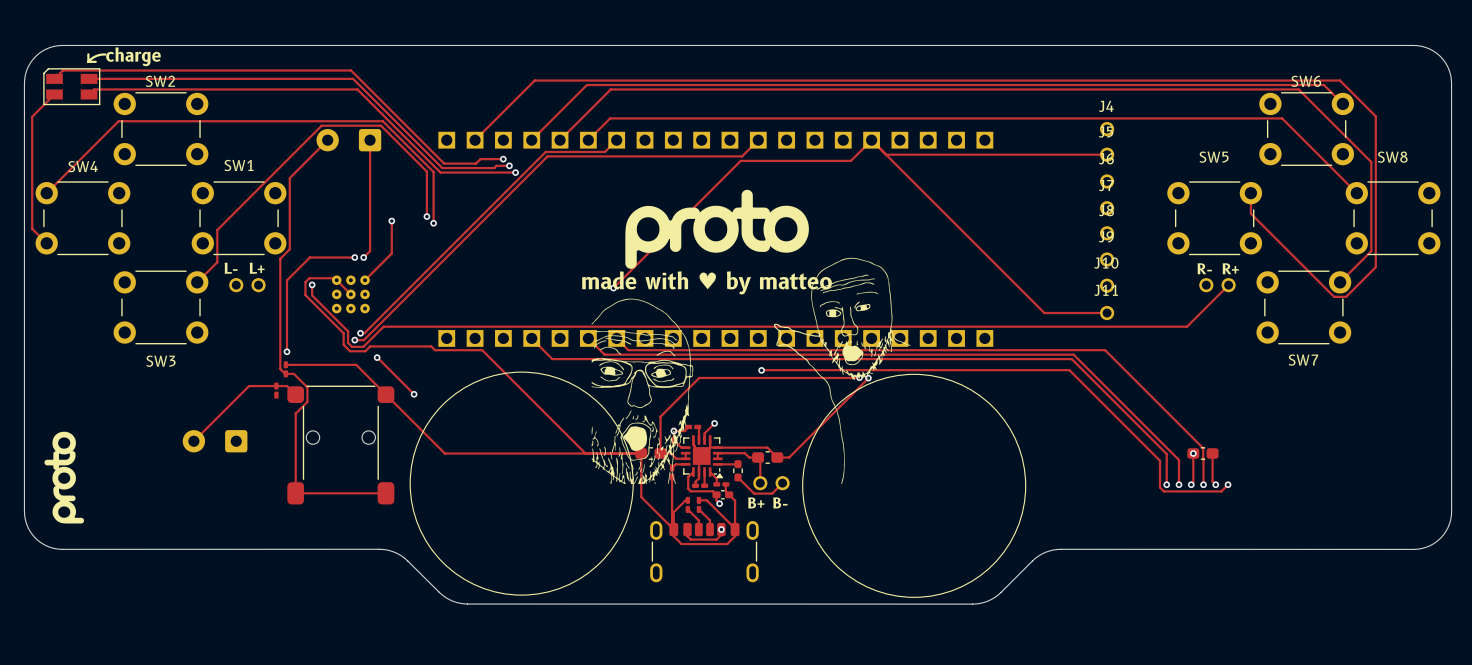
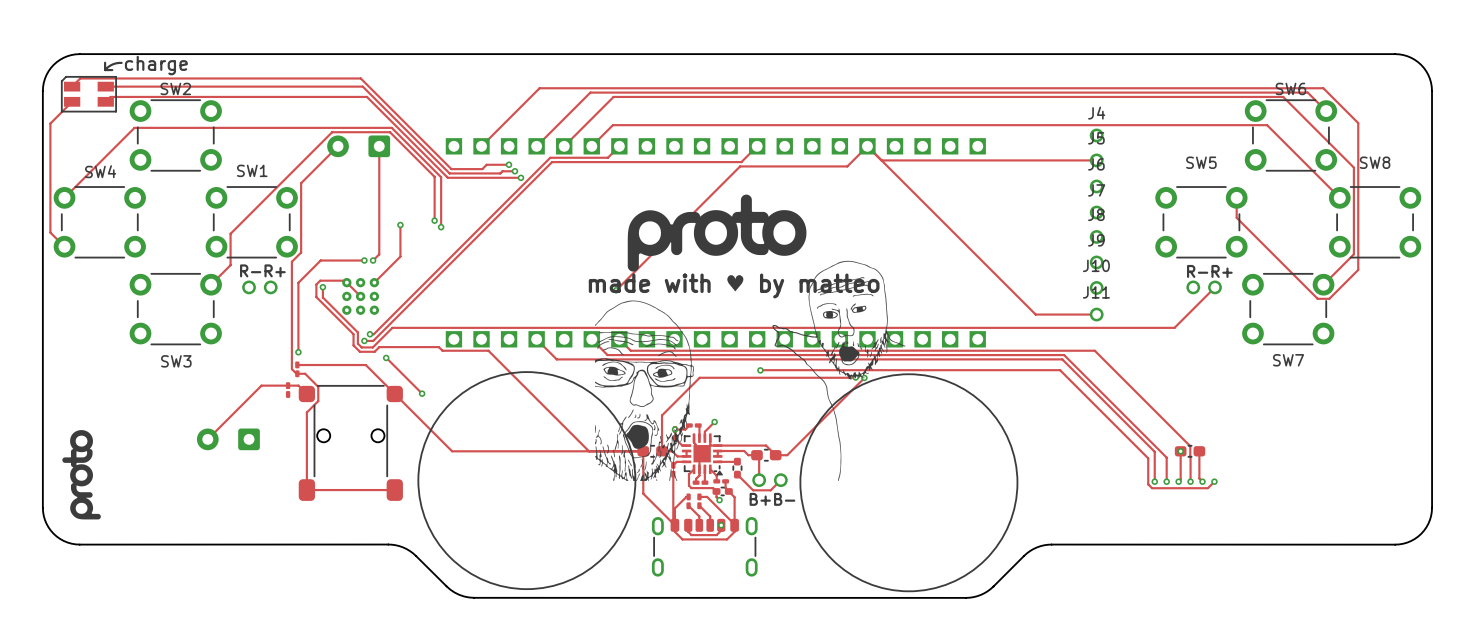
text: L- (231, 268) -> R- (250, 270)
text: L+ (257, 268) -> R+ (275, 270)

